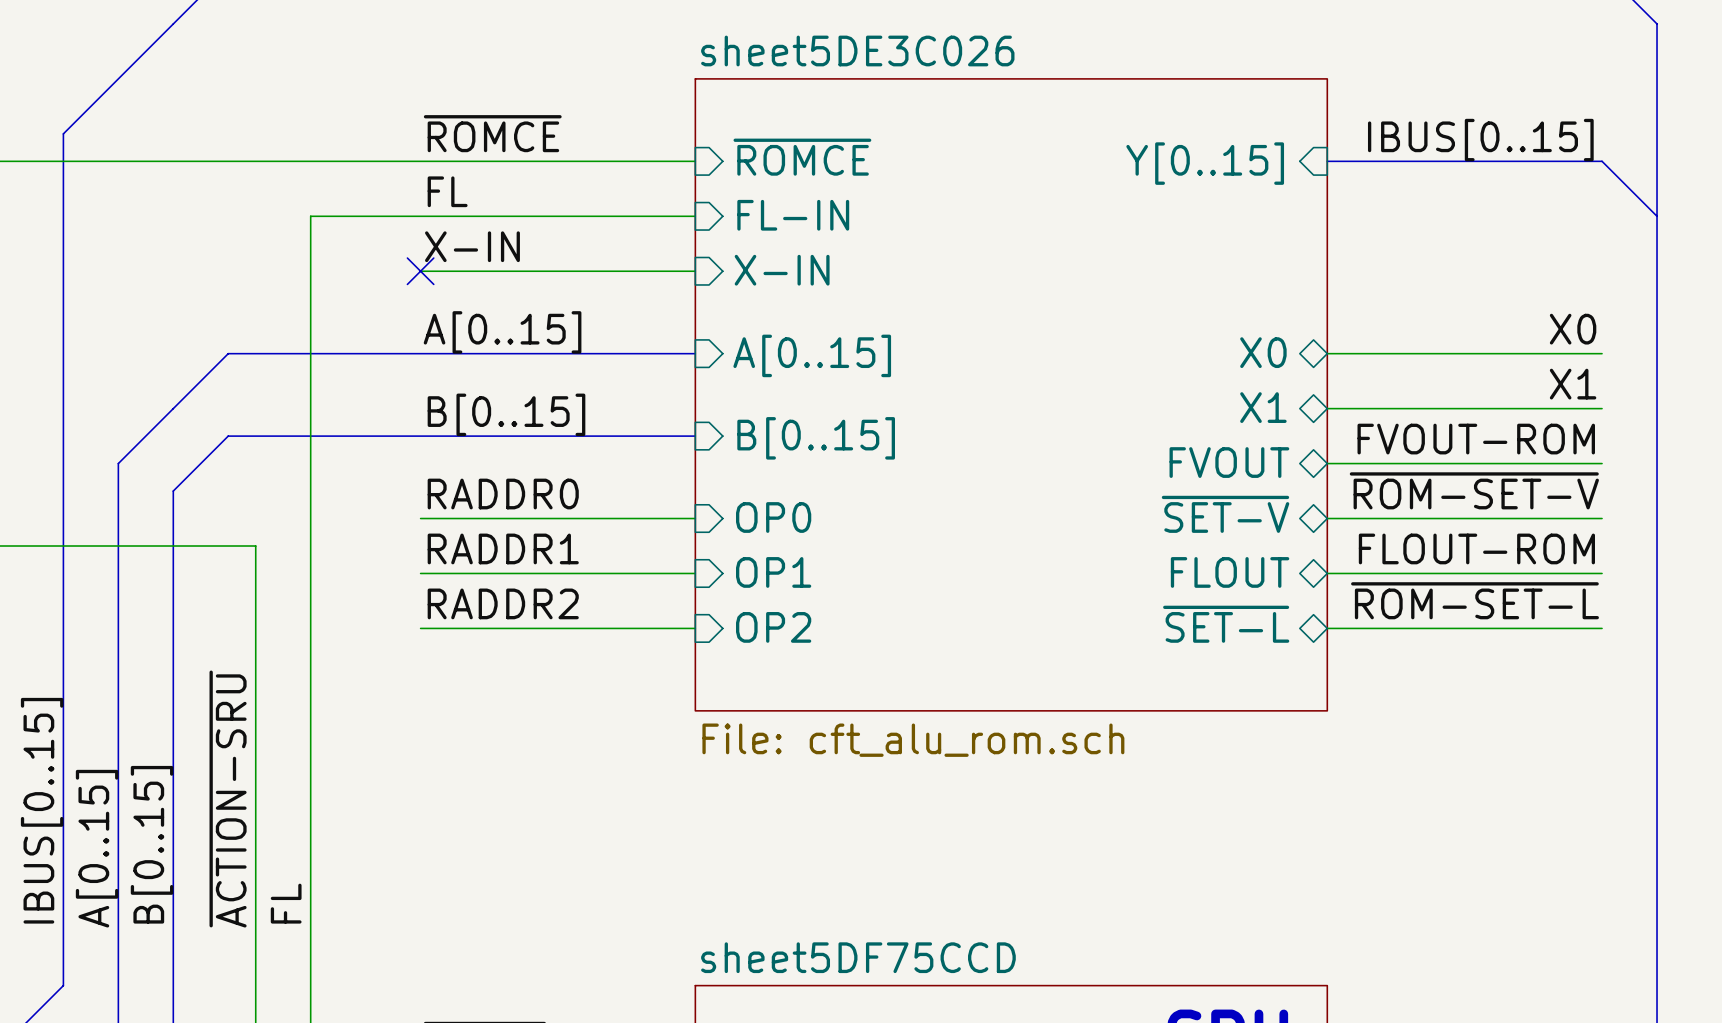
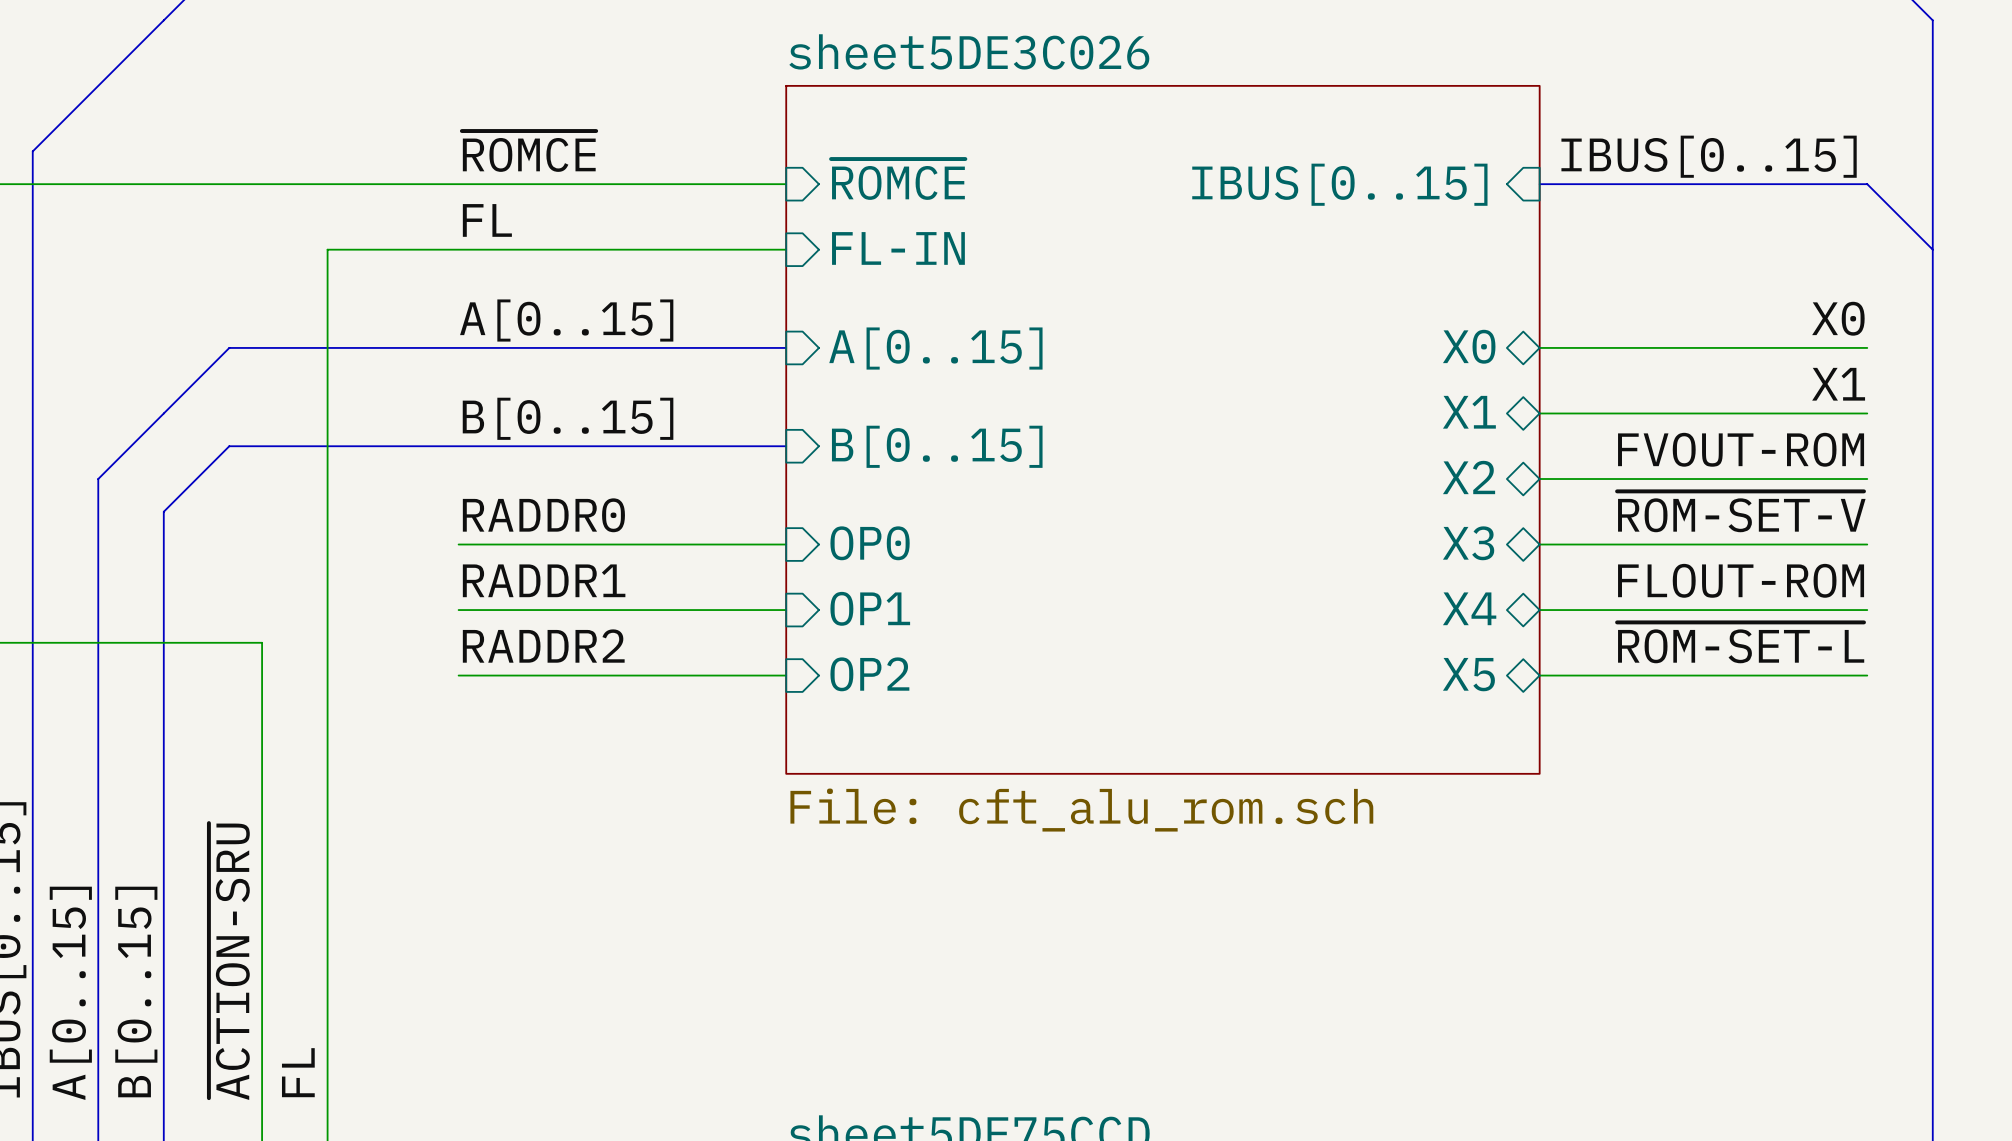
sheet sheet5DE3C026 shape: [695, 78, 1328, 711] -> [786, 85, 1540, 774]
sheet pin: Y[0..15] (1205, 163) -> IBUS[0..15] (1339, 184)
label: X-IN (472, 246) -> none
sheet pin: X-IN (782, 270) -> none
wire: (420, 271) (695, 271) -> none
no-connect mark: (420, 271) -> none
label: none -> X0 (1838, 318)
sheet pin: none -> X0 (1469, 346)
label: X0 (1573, 329) -> X1 (1838, 384)
label position: A[0..15] (502, 332) -> A[0..15] (566, 320)
sheet pin: X0 (1263, 352) -> X1 (1469, 412)
bus: (695, 353) (228, 353) (118, 463) -> (786, 347) (229, 347) (98, 479) (98, 544)
sheet pin position: A[0..15] (812, 355) -> A[0..15] (935, 348)
label: X1 (1573, 384) -> FVOUT-ROM (1741, 449)
sheet pin: X1 (1263, 407) -> X2 (1469, 477)
label position: B[0..15] (506, 414) -> B[0..15] (568, 418)
bus: (695, 436) (228, 436) (173, 491) -> (786, 446) (229, 446) (163, 511) (163, 577)
sheet pin position: B[0..15] (816, 438) -> B[0..15] (937, 446)
label: none -> RADDR0 (543, 515)
label: FVOUT-ROM (1476, 439) -> ~{ROM-SET-V} (1741, 511)
sheet pin: none -> OP0 (870, 543)
sheet pin: FVOUT (1229, 462) -> X3 (1468, 543)
label: ~{ROM-SET-V} (1474, 490) -> FLOUT-ROM (1741, 580)
label: RADDR0 (503, 494) -> RADDR1 (544, 580)
sheet pin: ~{SET-V} (1225, 514) -> X4 (1469, 608)
sheet pin: OP0 (773, 517) -> OP1 (870, 608)
label: RADDR1 (503, 548) -> RADDR2 (543, 646)
label: FLOUT-ROM (1476, 548) -> ~{ROM-SET-L} (1740, 642)
sheet pin: OP1 (773, 572) -> OP2 (869, 674)
sheet pin: FLOUT (1230, 572) -> X5 (1468, 674)
label: ~{ROM-SET-L} (1475, 600) -> none
label: RADDR2 (503, 603) -> none
sheet pin: ~{SET-L} (1226, 624) -> none
sheet pin: OP2 (773, 627) -> none
wire: (420, 628) (695, 628) -> (458, 544) (786, 544)
wire: (1327, 628) (1602, 628) -> (1539, 347) (1867, 347)

